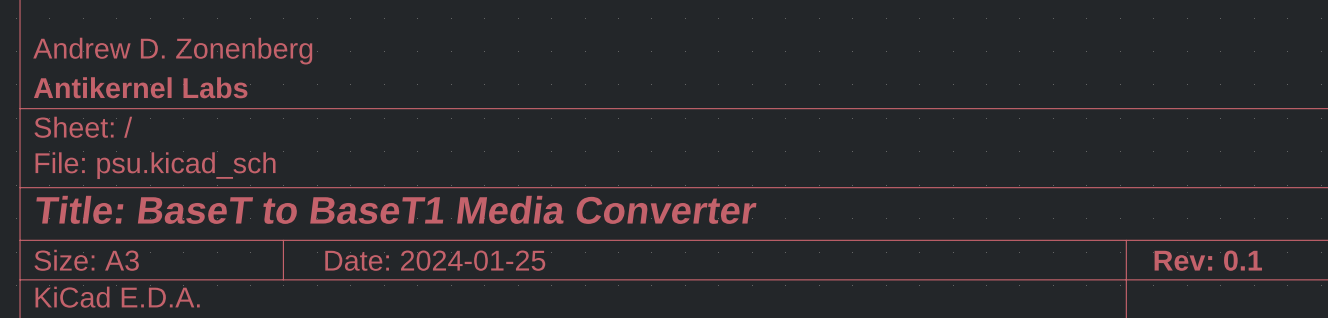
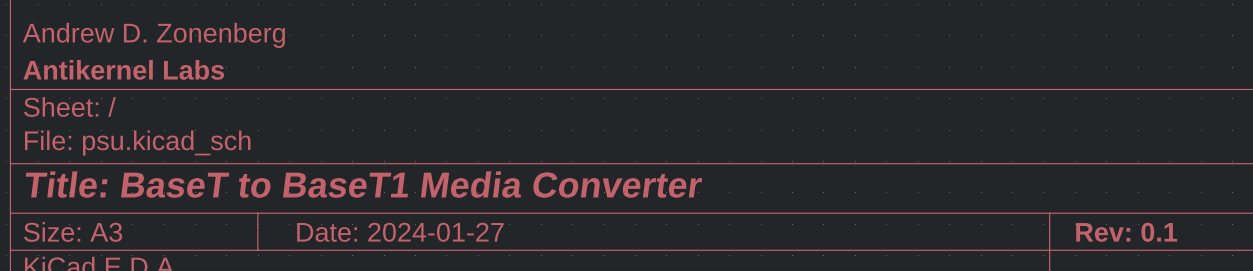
title block: Date: 2024-01-25 (435, 260) -> Date: 2024-01-27 (400, 232)

